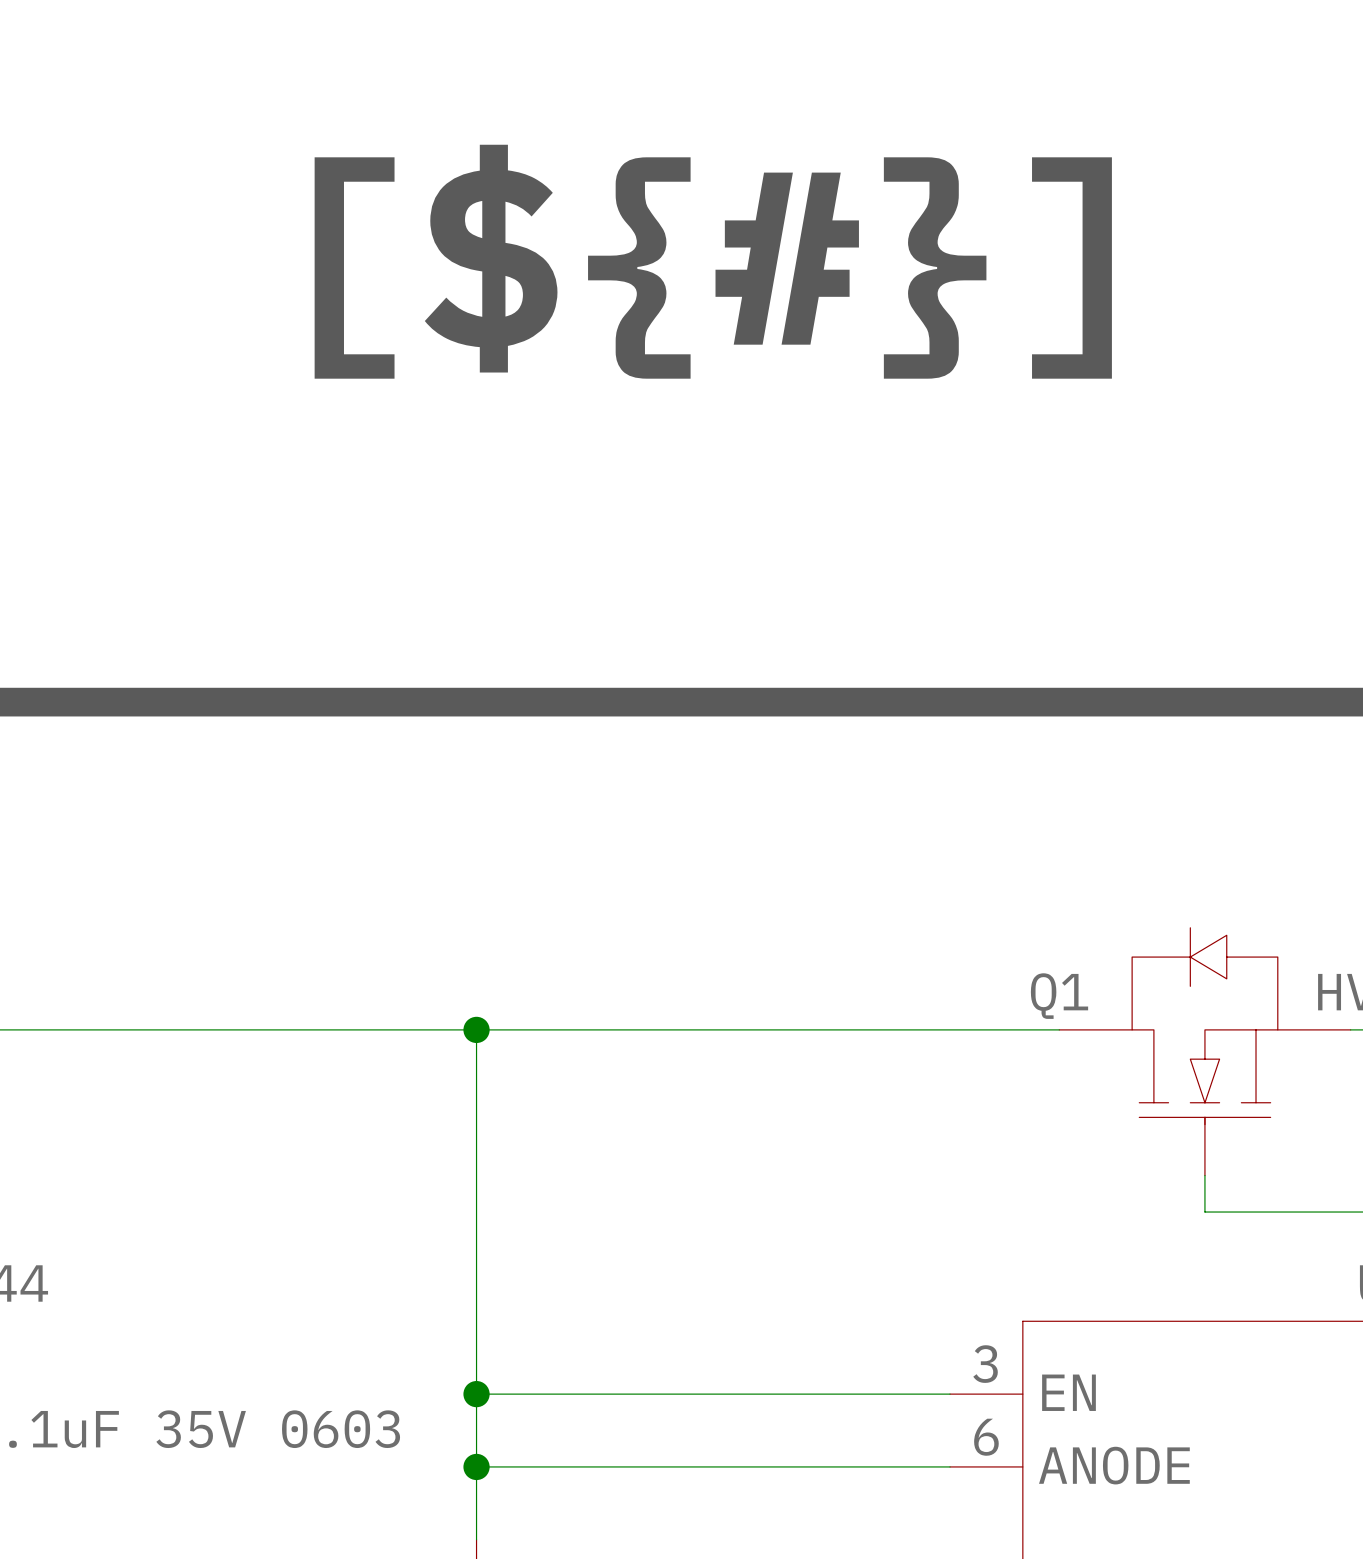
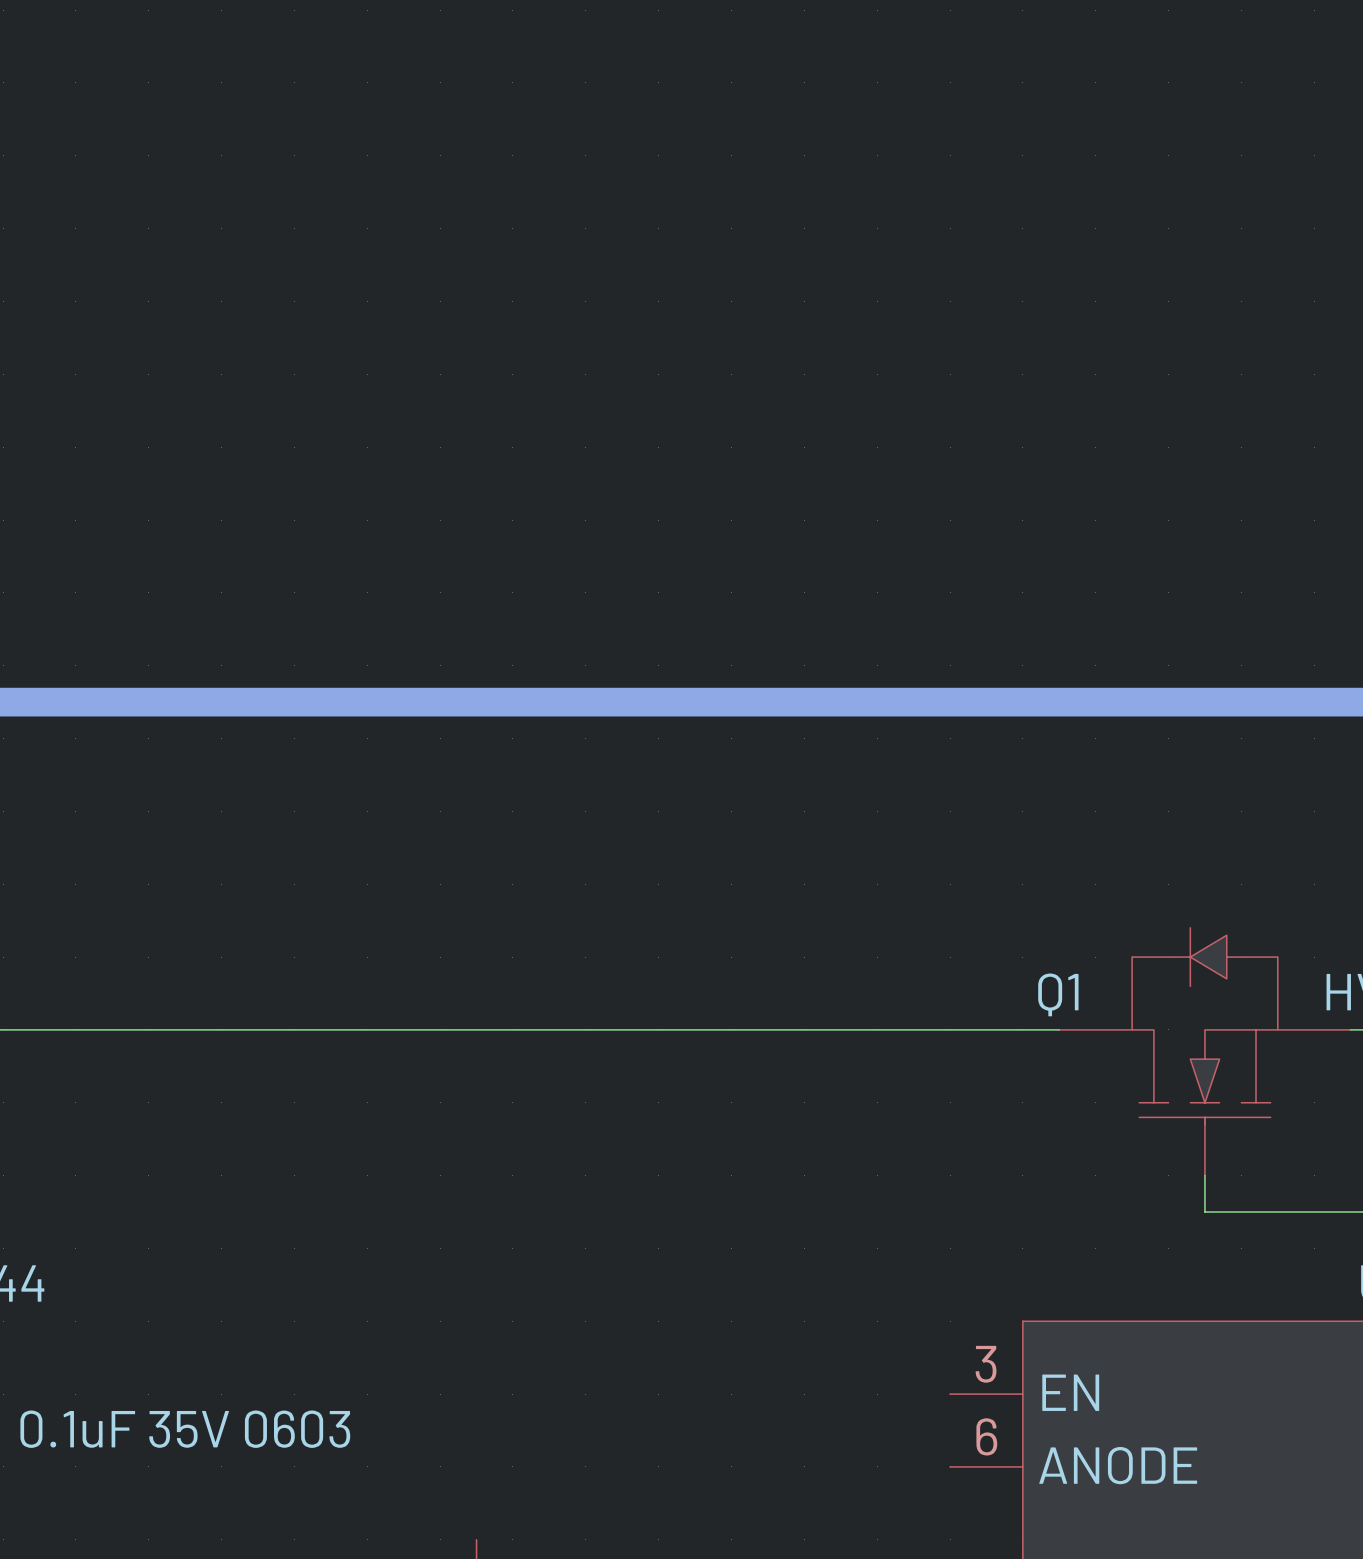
text: [${#}] (713, 261) -> none
wire: (476, 1029) (476, 1539) -> none
junction: (476, 1029) -> none
wire: (476, 1394) (950, 1394) -> none
junction: (476, 1394) -> none
wire: (476, 1466) (950, 1466) -> none
junction: (476, 1466) -> none

